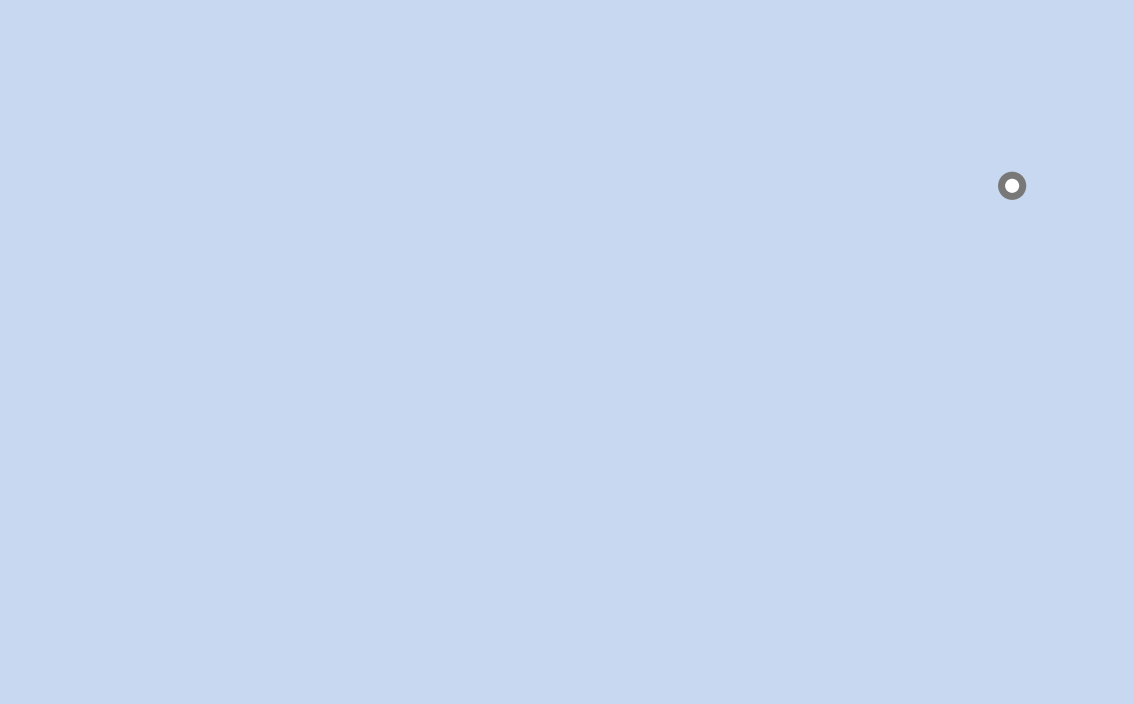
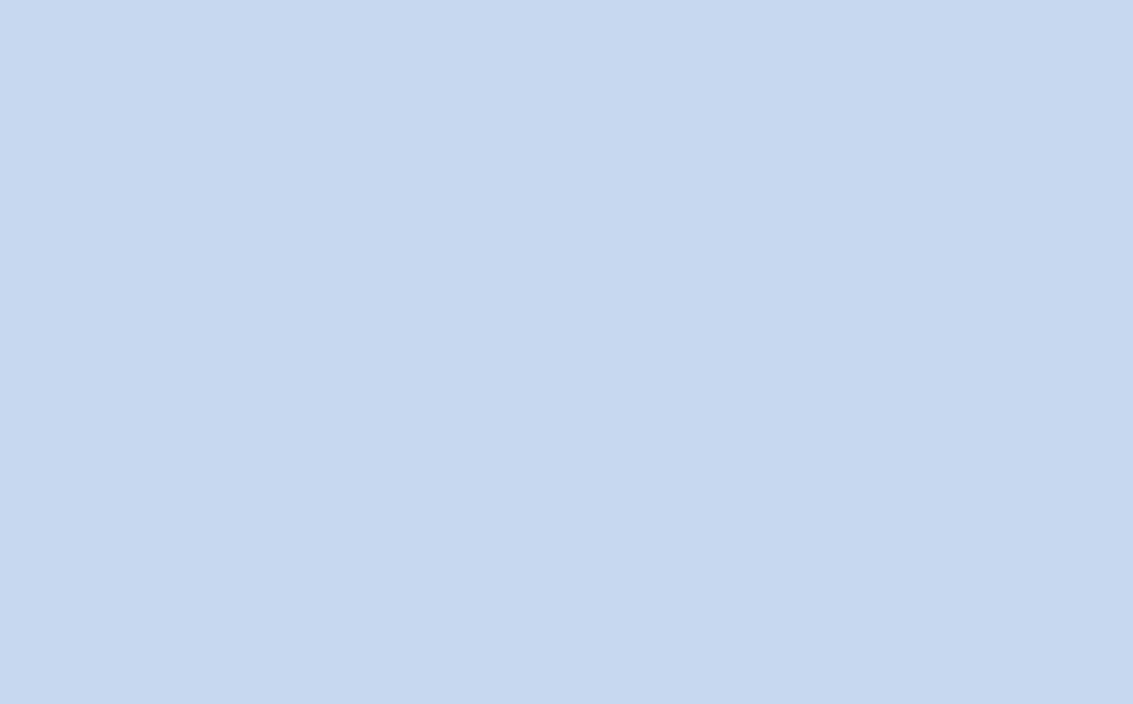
via: (1012, 185) -> none

